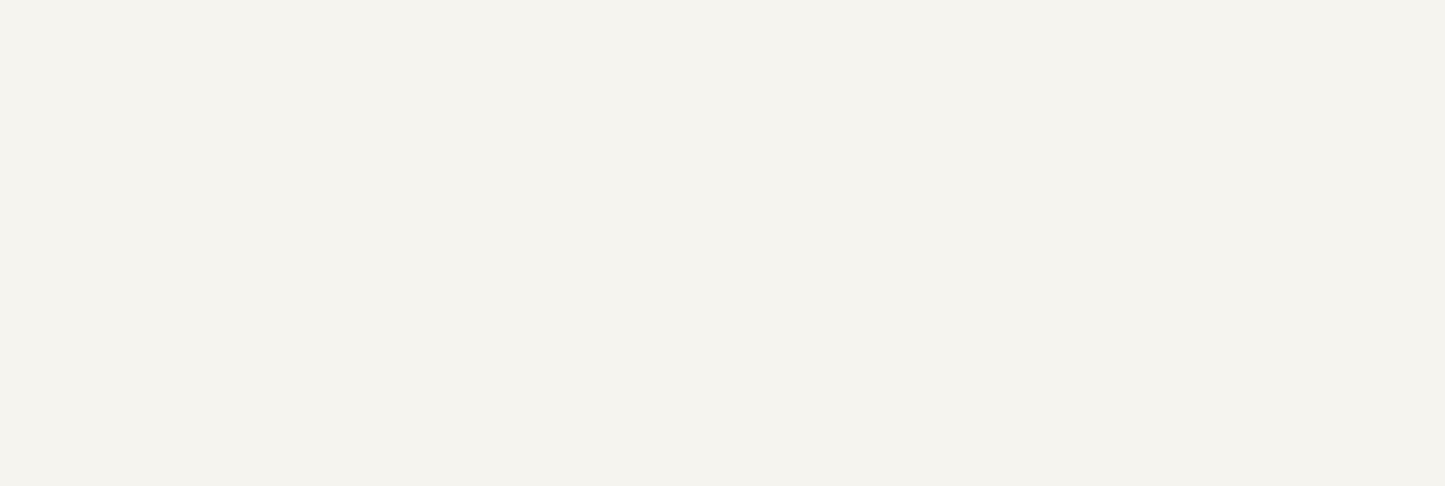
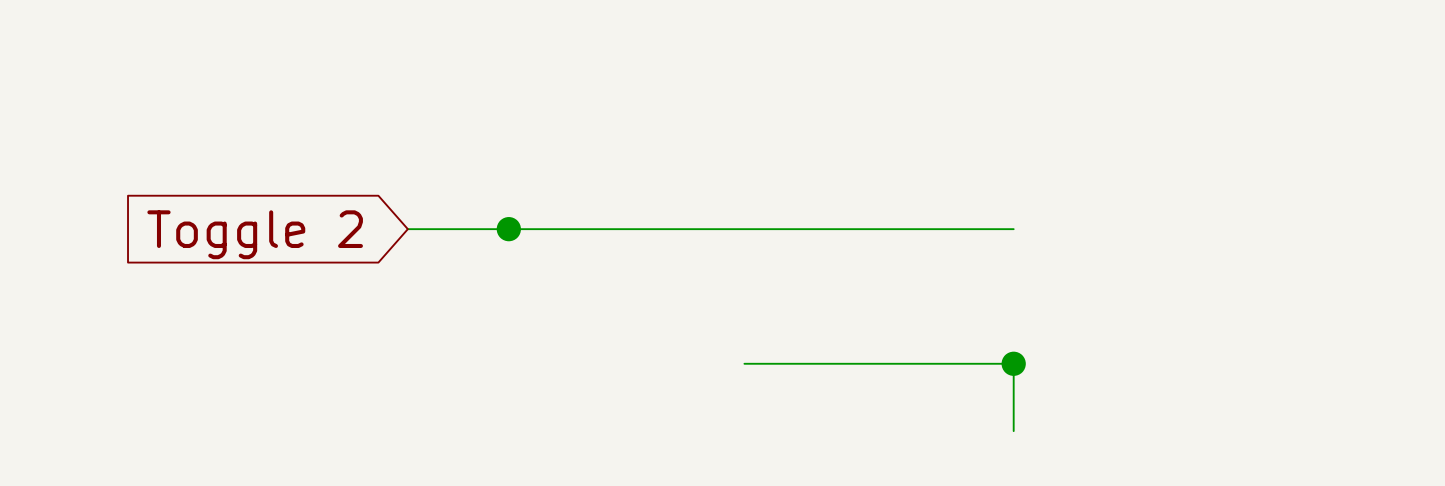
wire: none -> (407, 229) (1013, 229)
junction: none -> (508, 229)
global label: none -> Toggle 2 (255, 234)
wire: none -> (744, 363) (1013, 363) (1013, 431)
junction: none -> (1013, 363)

